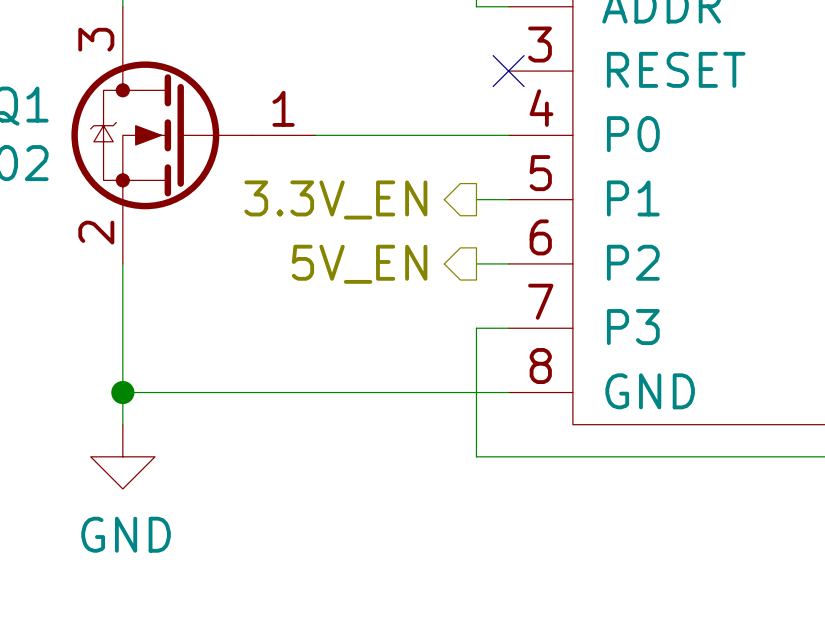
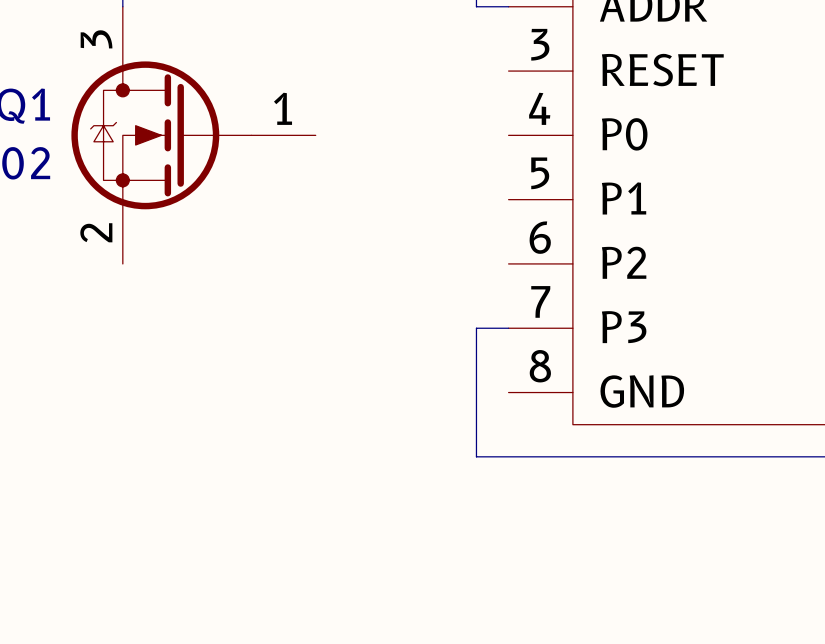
no-connect mark: (508, 71) -> none
wire: (315, 135) (508, 135) -> none
hierarchical label: 3.3V_EN (335, 199) -> none
wire: (476, 199) (508, 199) -> none
wire: (122, 263) (122, 424) -> none
wire: (476, 263) (508, 263) -> none
hierarchical label: 5V_EN (359, 264) -> none
wire: (122, 392) (508, 392) -> none
junction: (122, 392) -> none
power symbol: GND (122, 456) -> none

